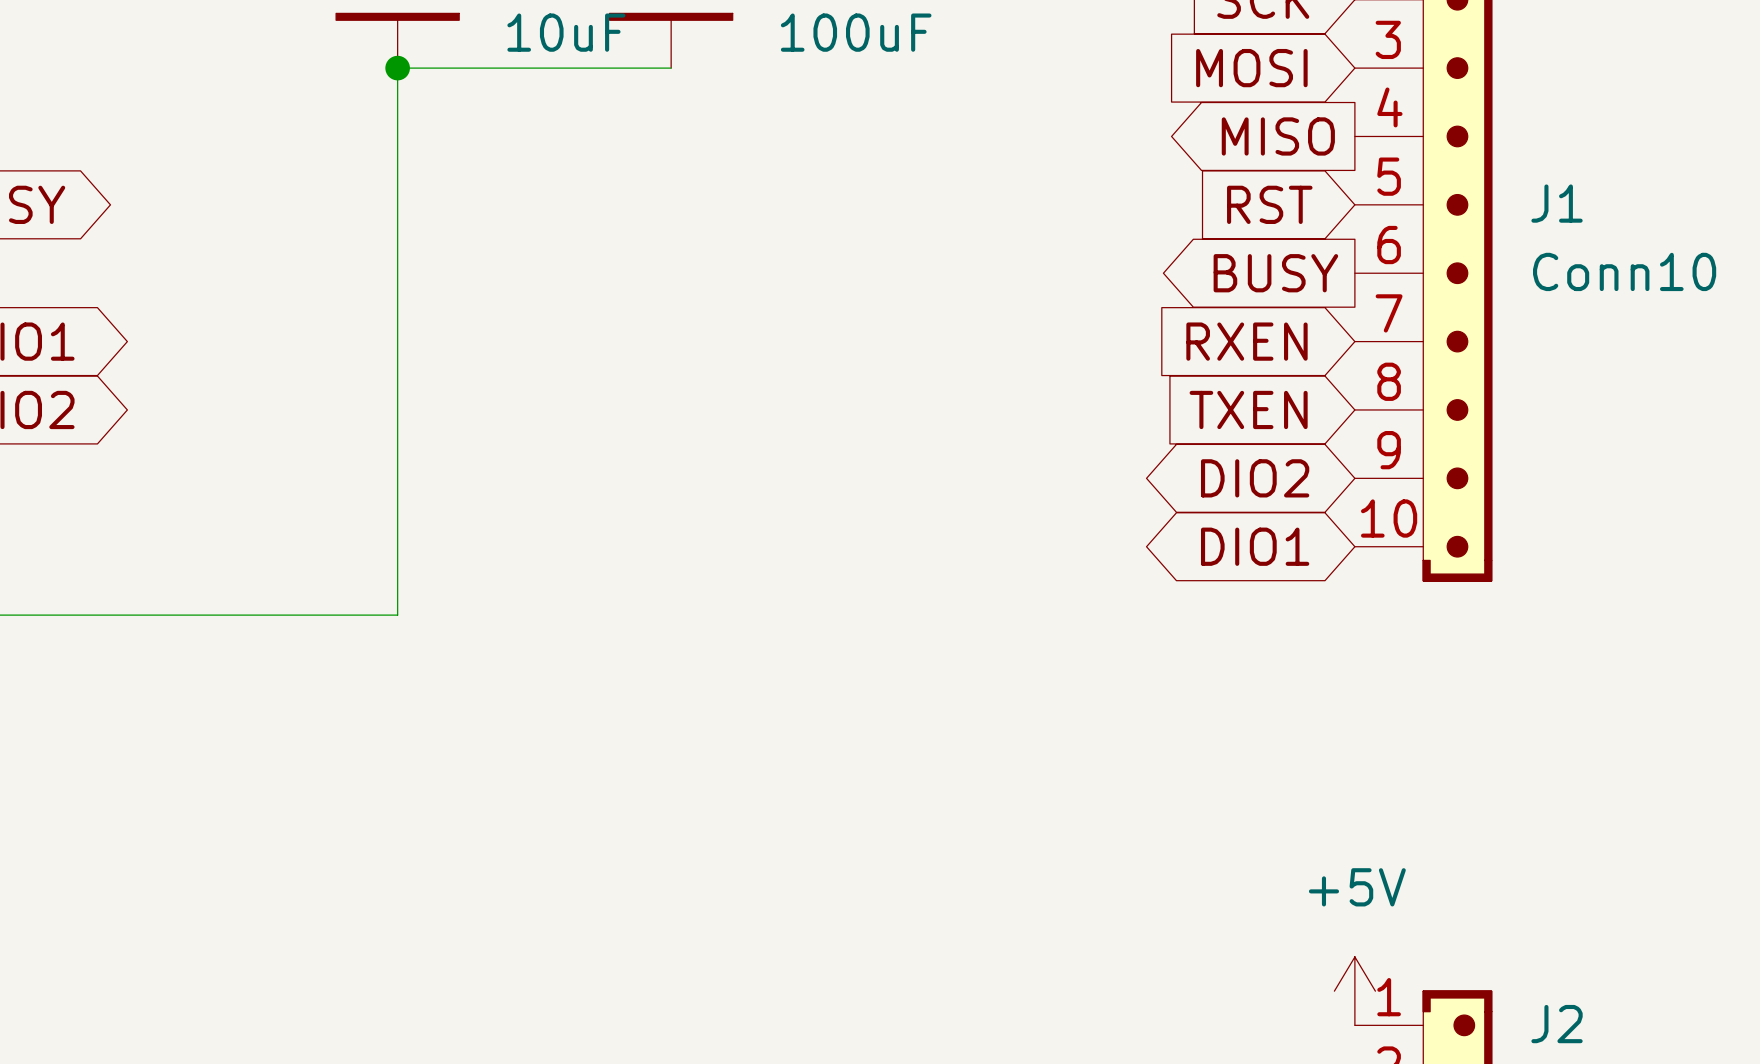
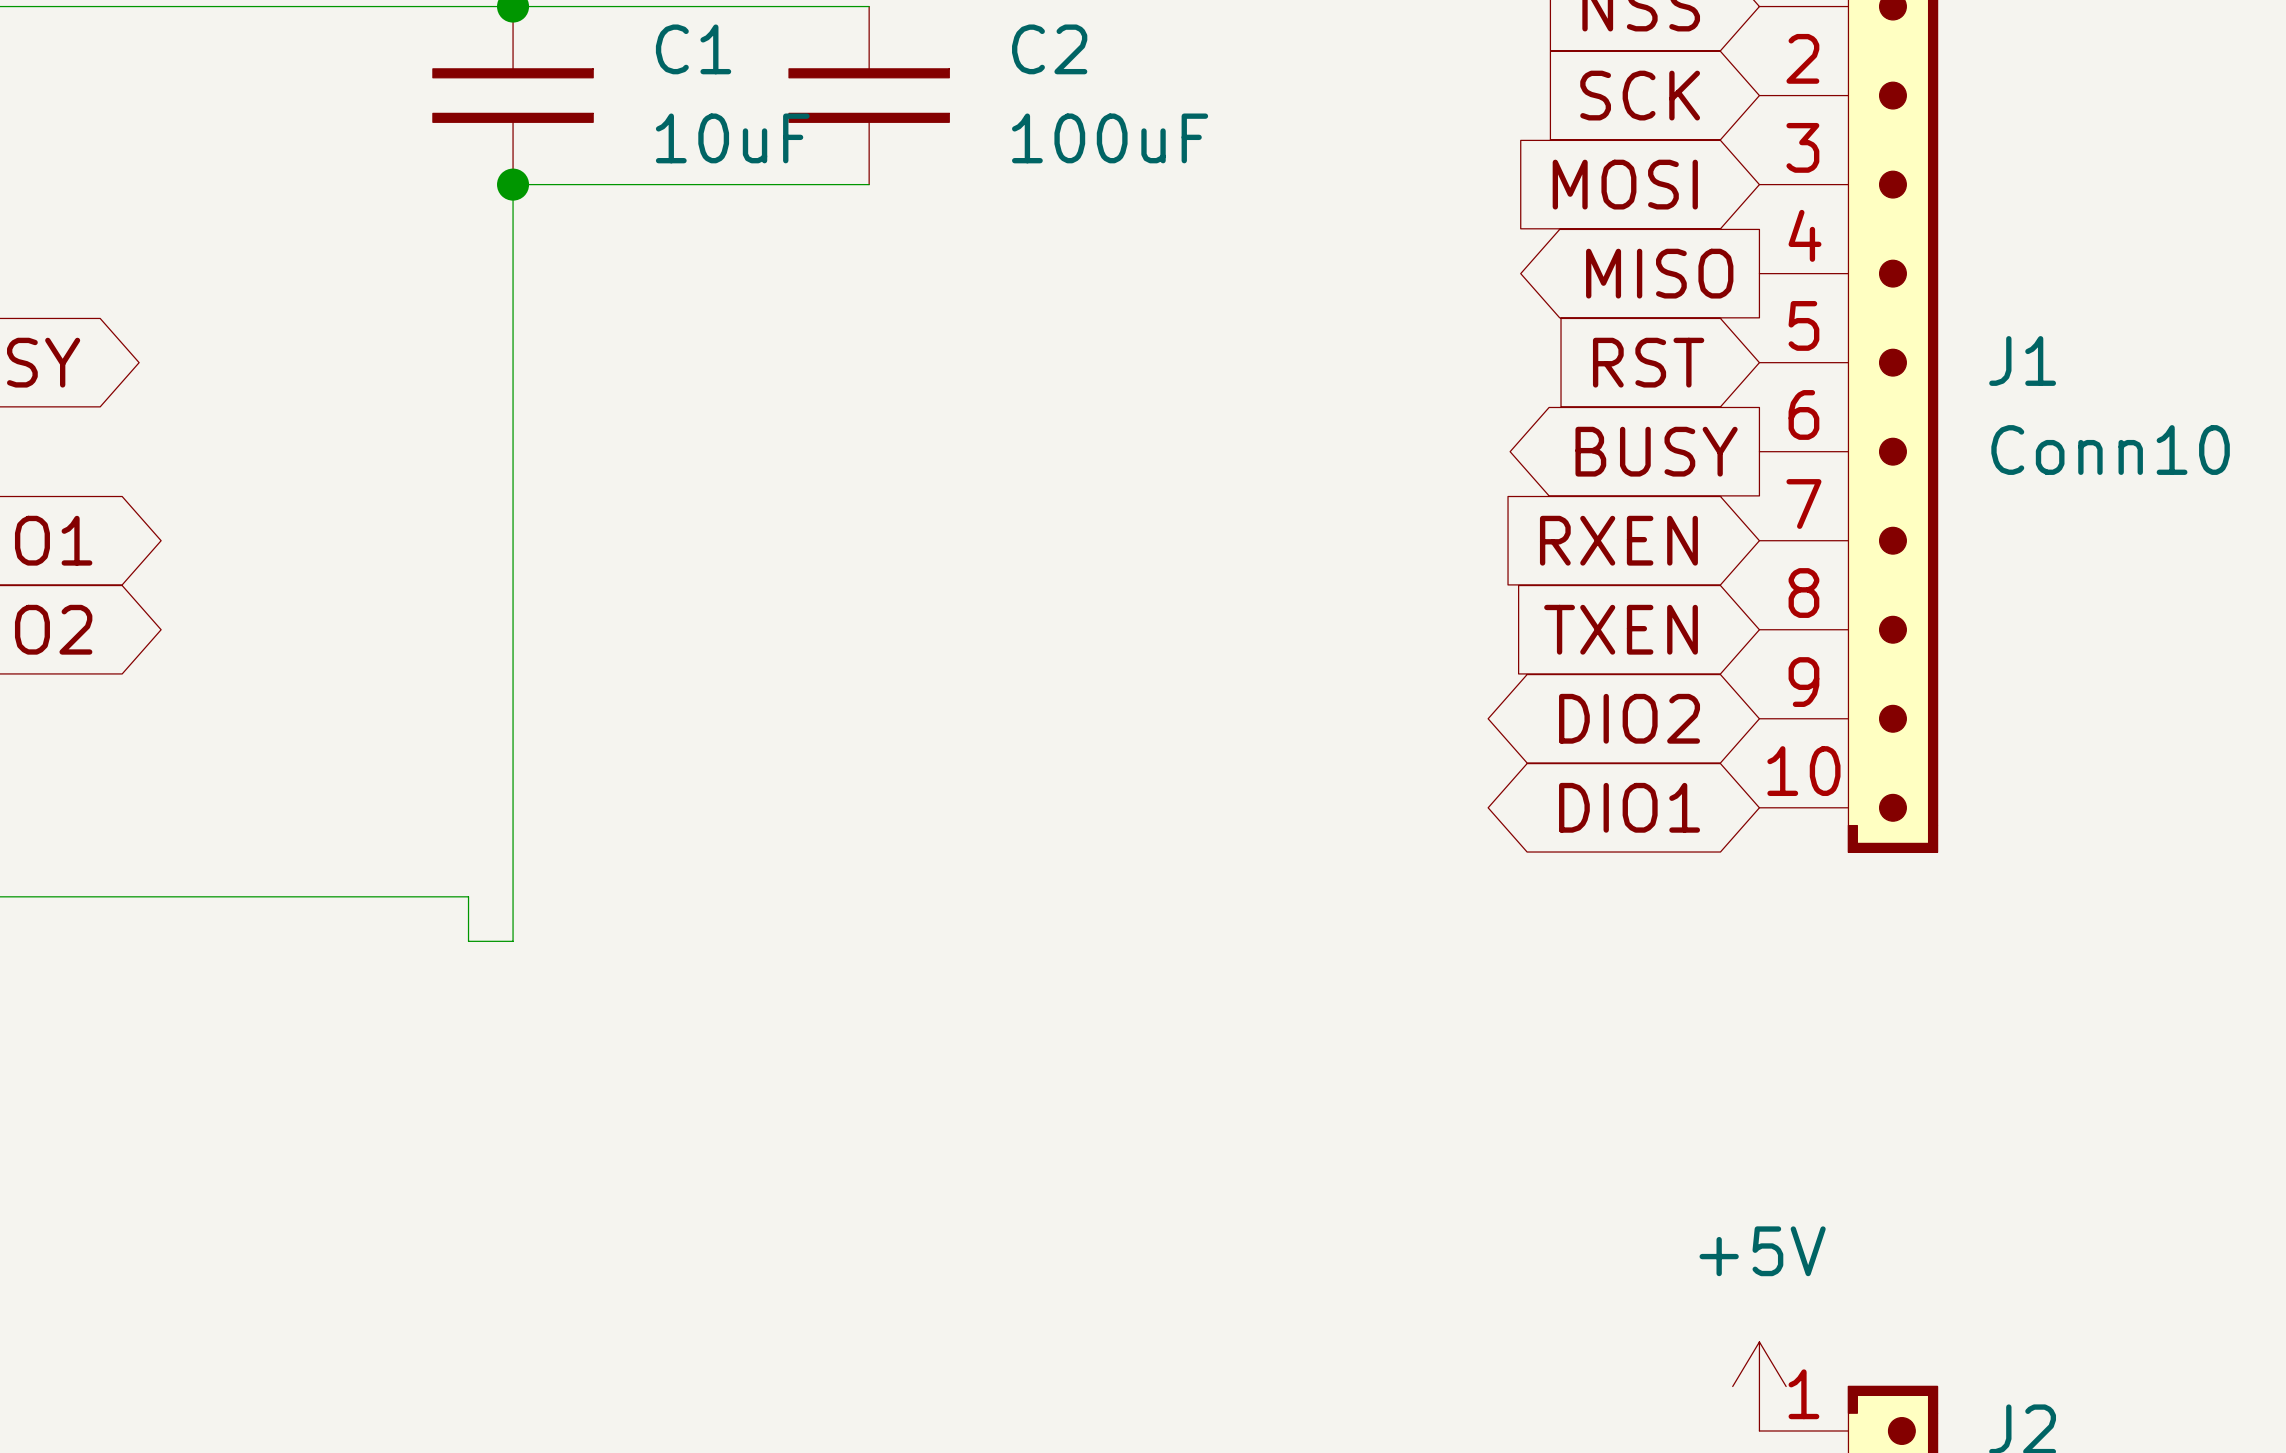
wire: (363, 615) (397, 615) -> (468, 896) (468, 941) (513, 941) (513, 896)

